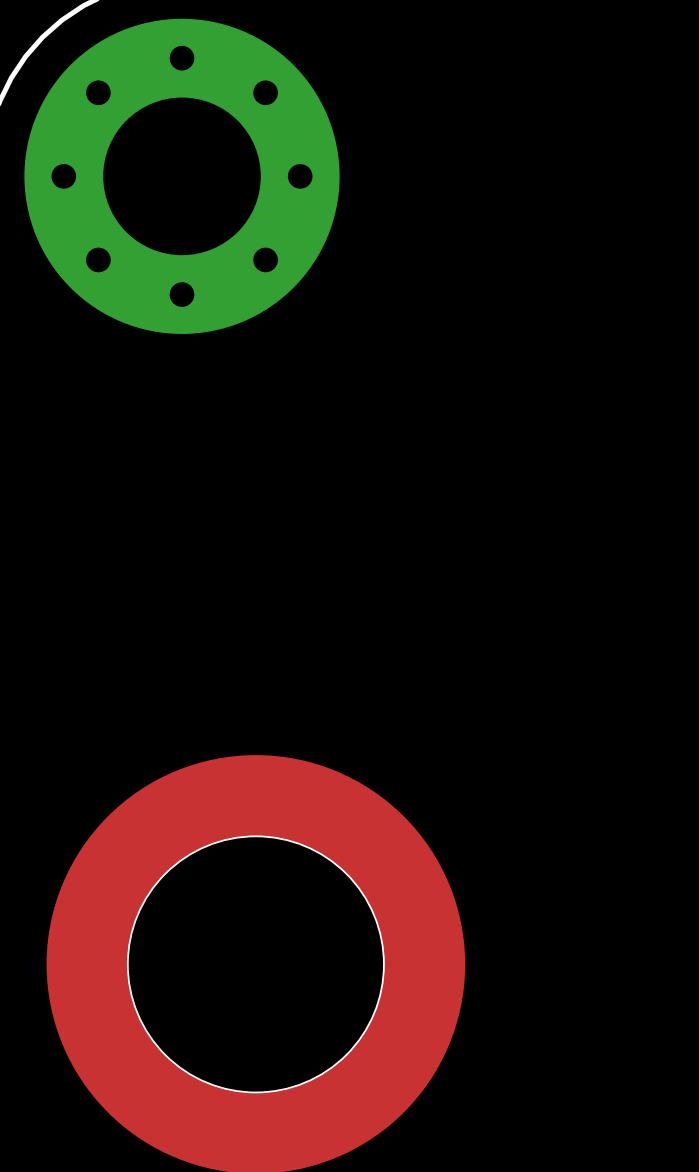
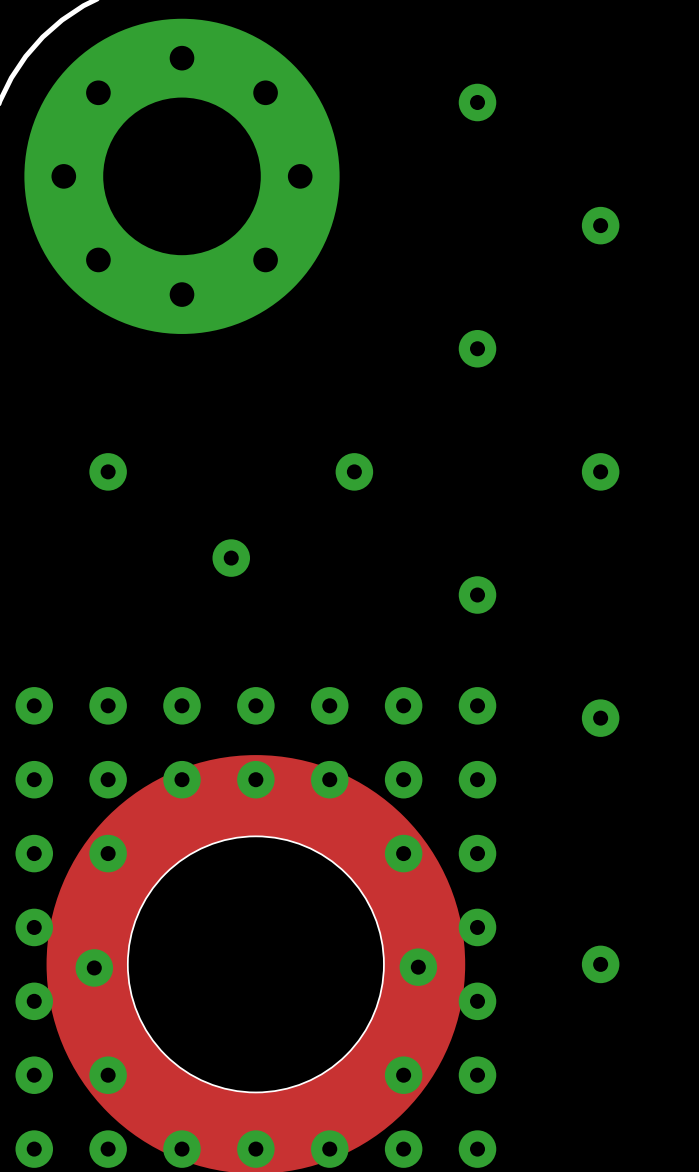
via: none -> (477, 102)
via: none -> (600, 225)
via: none -> (477, 348)
via: none -> (108, 471)
via: none -> (354, 471)
via: none -> (600, 471)
via: none -> (231, 558)
via: none -> (477, 595)
via: none -> (34, 705)
via: none -> (108, 705)
via: none -> (182, 705)
via: none -> (255, 705)
via: none -> (329, 705)
via: none -> (403, 705)
via: none -> (477, 705)
via: none -> (600, 718)
via: none -> (34, 779)
via: none -> (108, 779)
via: none -> (182, 779)
via: none -> (255, 779)
via: none -> (329, 779)
via: none -> (403, 779)
via: none -> (477, 779)
via: none -> (34, 853)
via: none -> (108, 853)
via: none -> (403, 853)
via: none -> (477, 853)
via: none -> (34, 927)
via: none -> (477, 927)
via: none -> (600, 964)
via: none -> (94, 967)
via: none -> (418, 967)
via: none -> (34, 1001)
via: none -> (477, 1001)
via: none -> (34, 1075)
via: none -> (108, 1075)
via: none -> (403, 1075)
via: none -> (477, 1075)
via: none -> (34, 1149)
via: none -> (108, 1149)
via: none -> (182, 1149)
via: none -> (255, 1149)
via: none -> (329, 1149)
via: none -> (403, 1149)
via: none -> (477, 1149)

